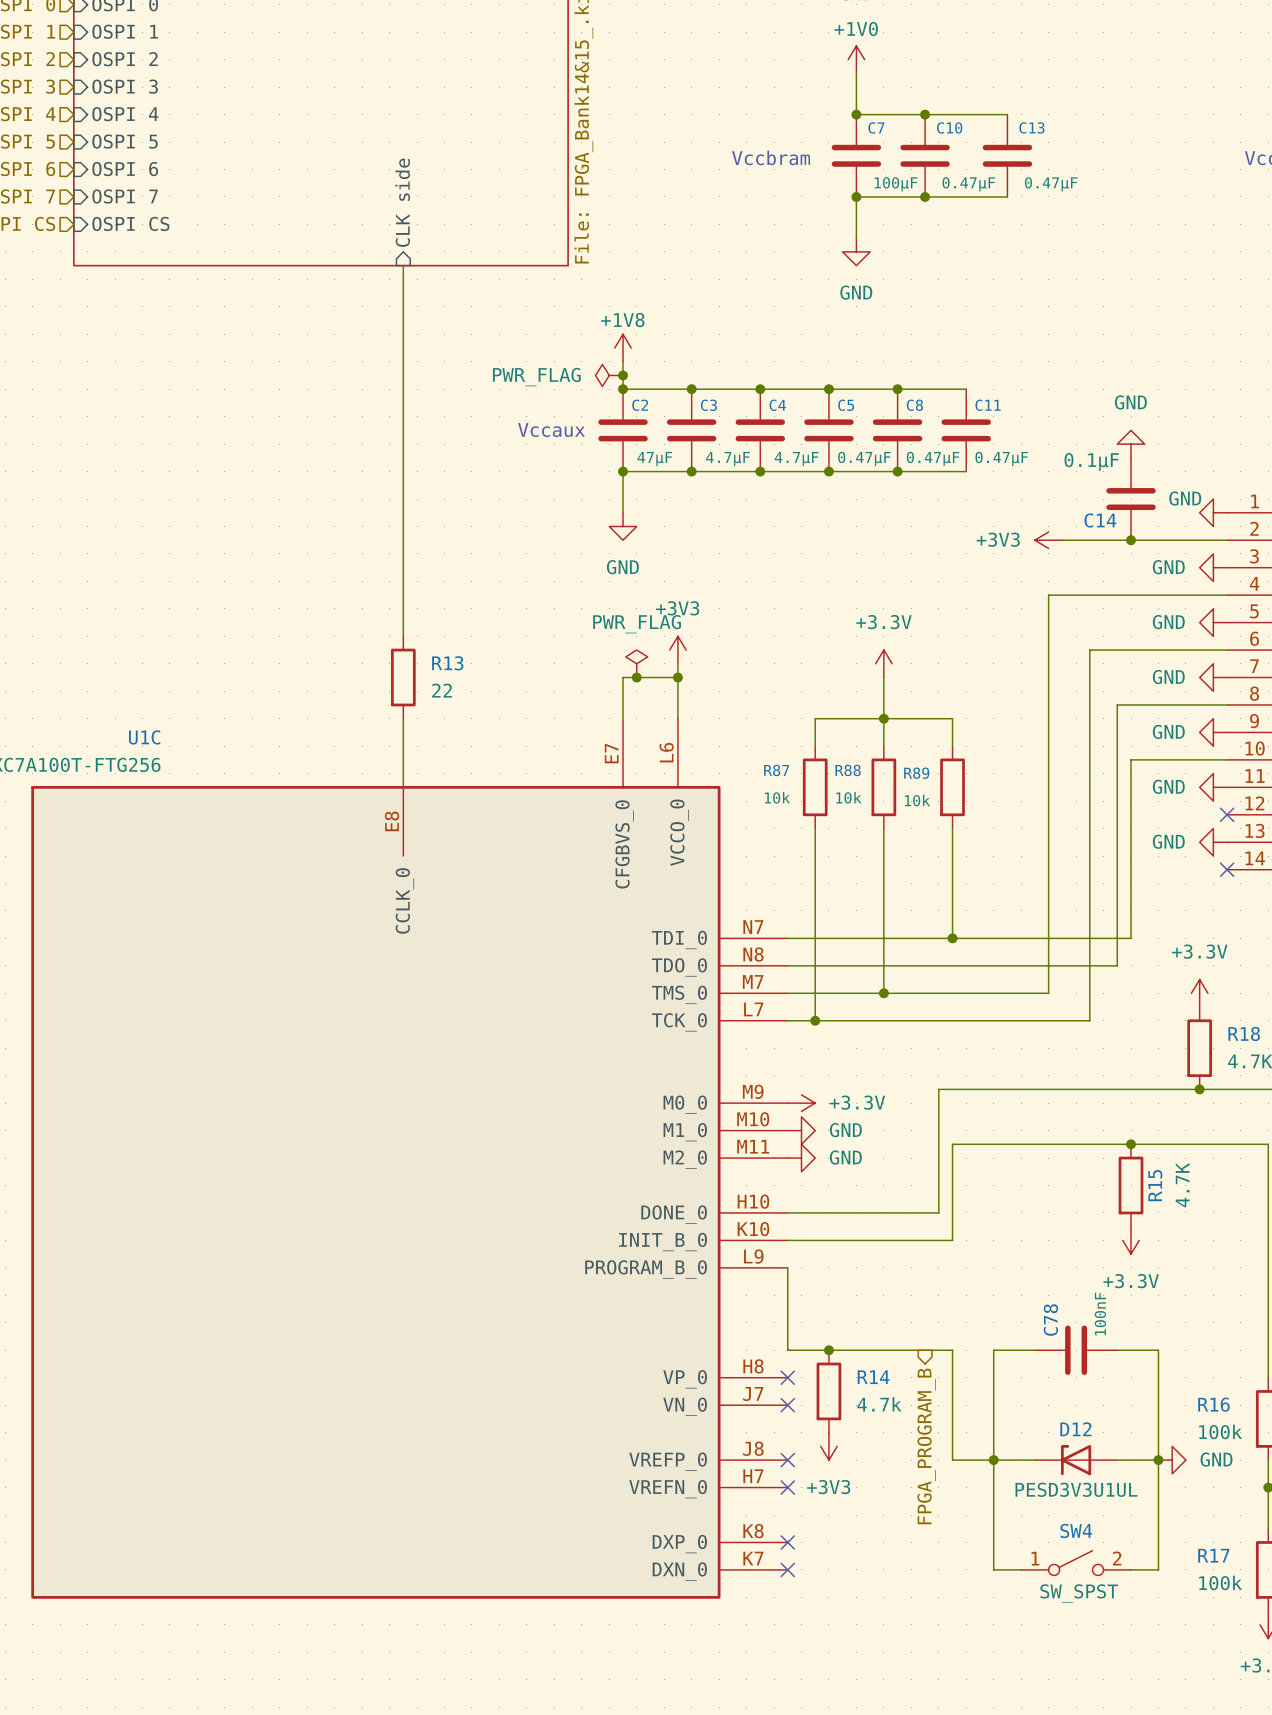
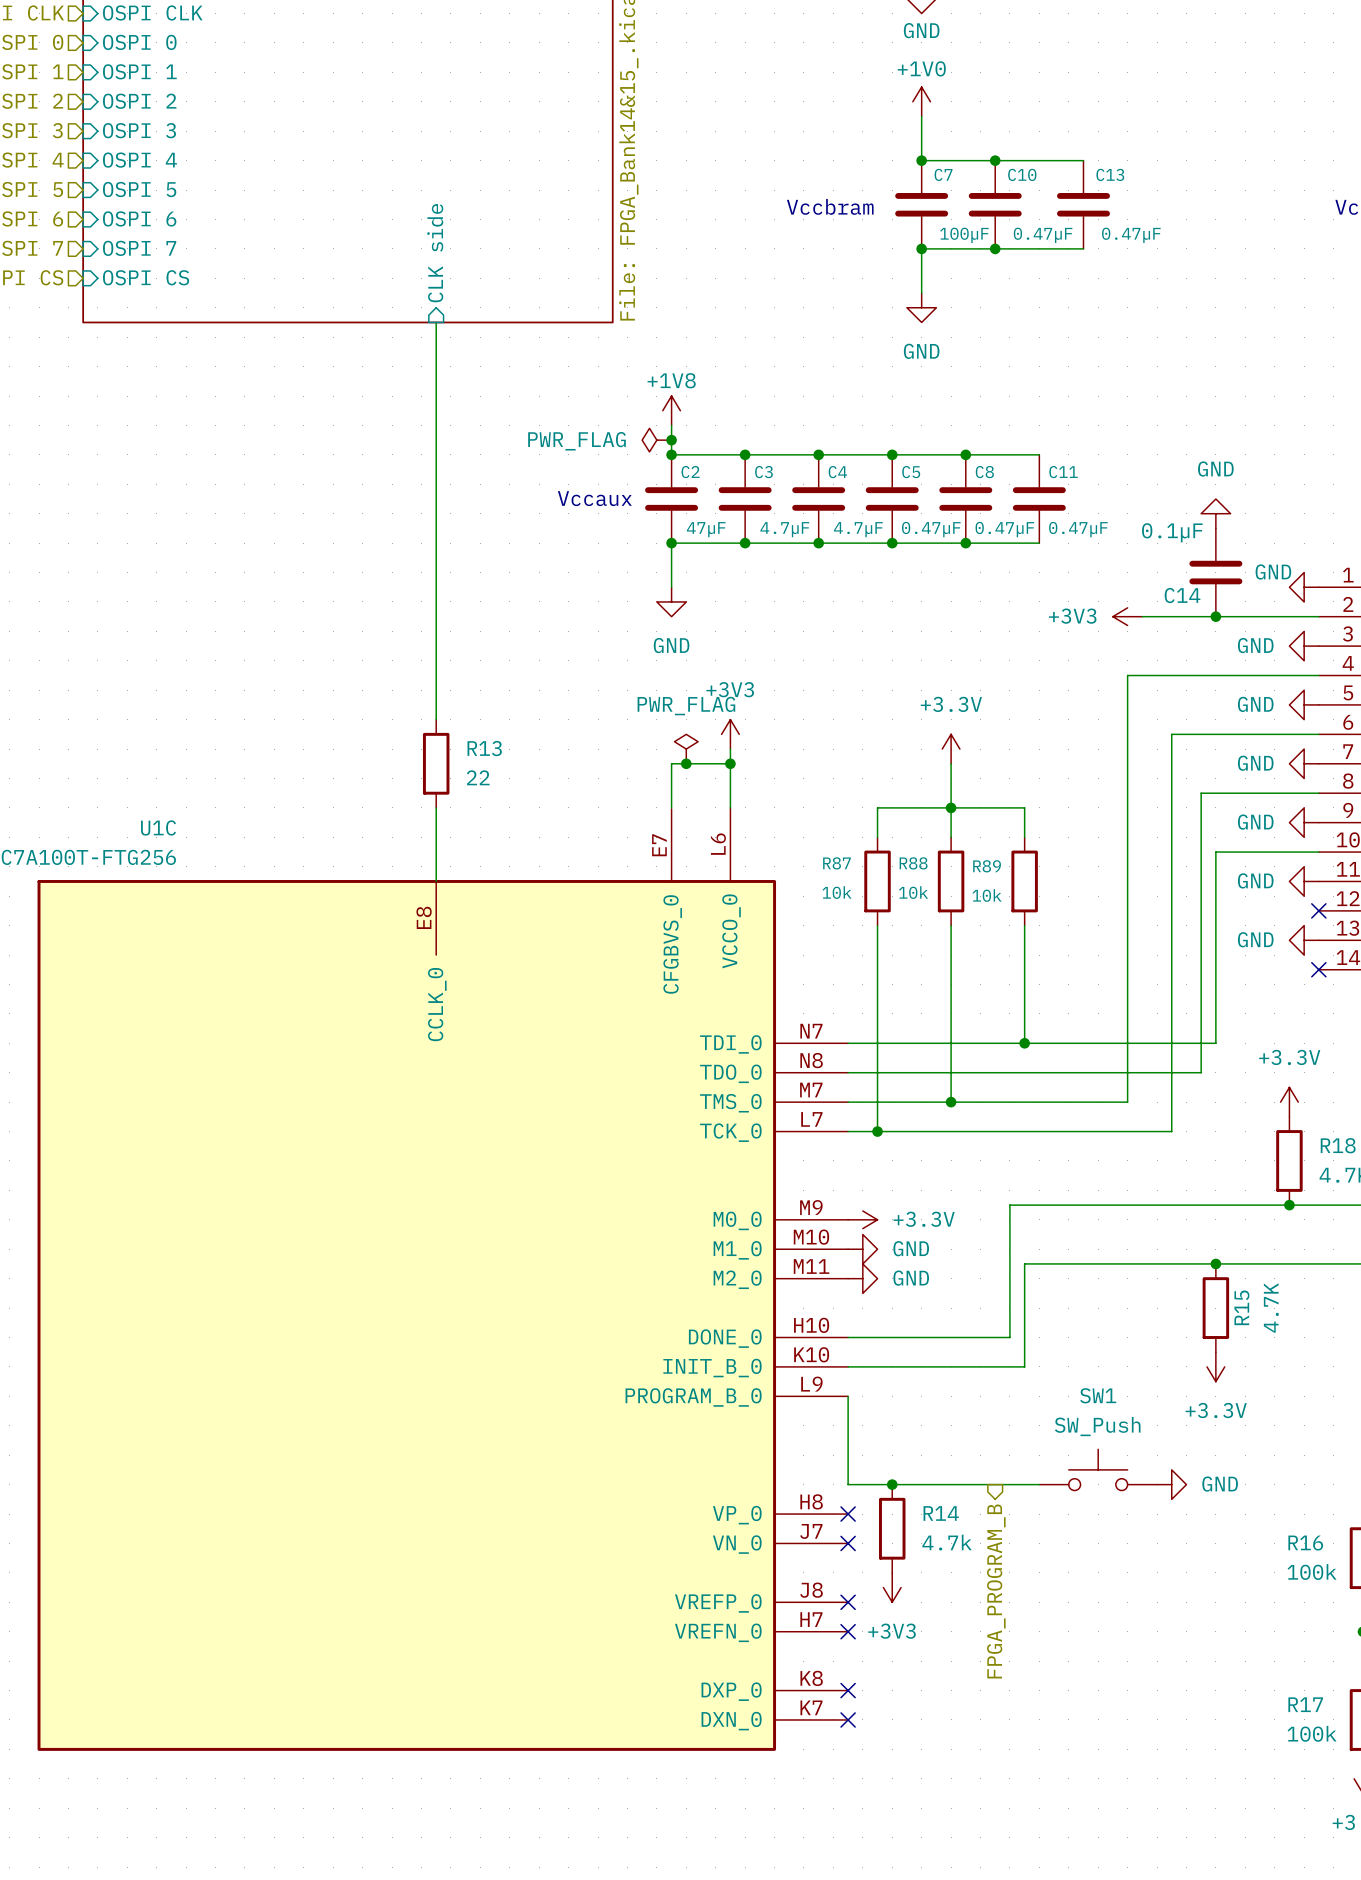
SW1: none -> SW_Push (1098, 1469)
wire: (952, 1350) (952, 1460) (1034, 1460) -> (1024, 1484) (1039, 1484)
wire: (1034, 1350) (993, 1350) (993, 1569) (1021, 1569) -> none
C78: 100nF (1076, 1350) -> none
wire: (1117, 1350) (1158, 1350) (1158, 1569) (1131, 1569) -> none
junction: (993, 1460) -> none
D12: PESD3V3U1UL (1076, 1460) -> none
wire: (1117, 1460) (1158, 1460) -> none
junction: (1158, 1460) -> none
power symbol position: GND (1172, 1460) -> GND (1171, 1484)
SW4: SW_SPST (1076, 1563) -> none

